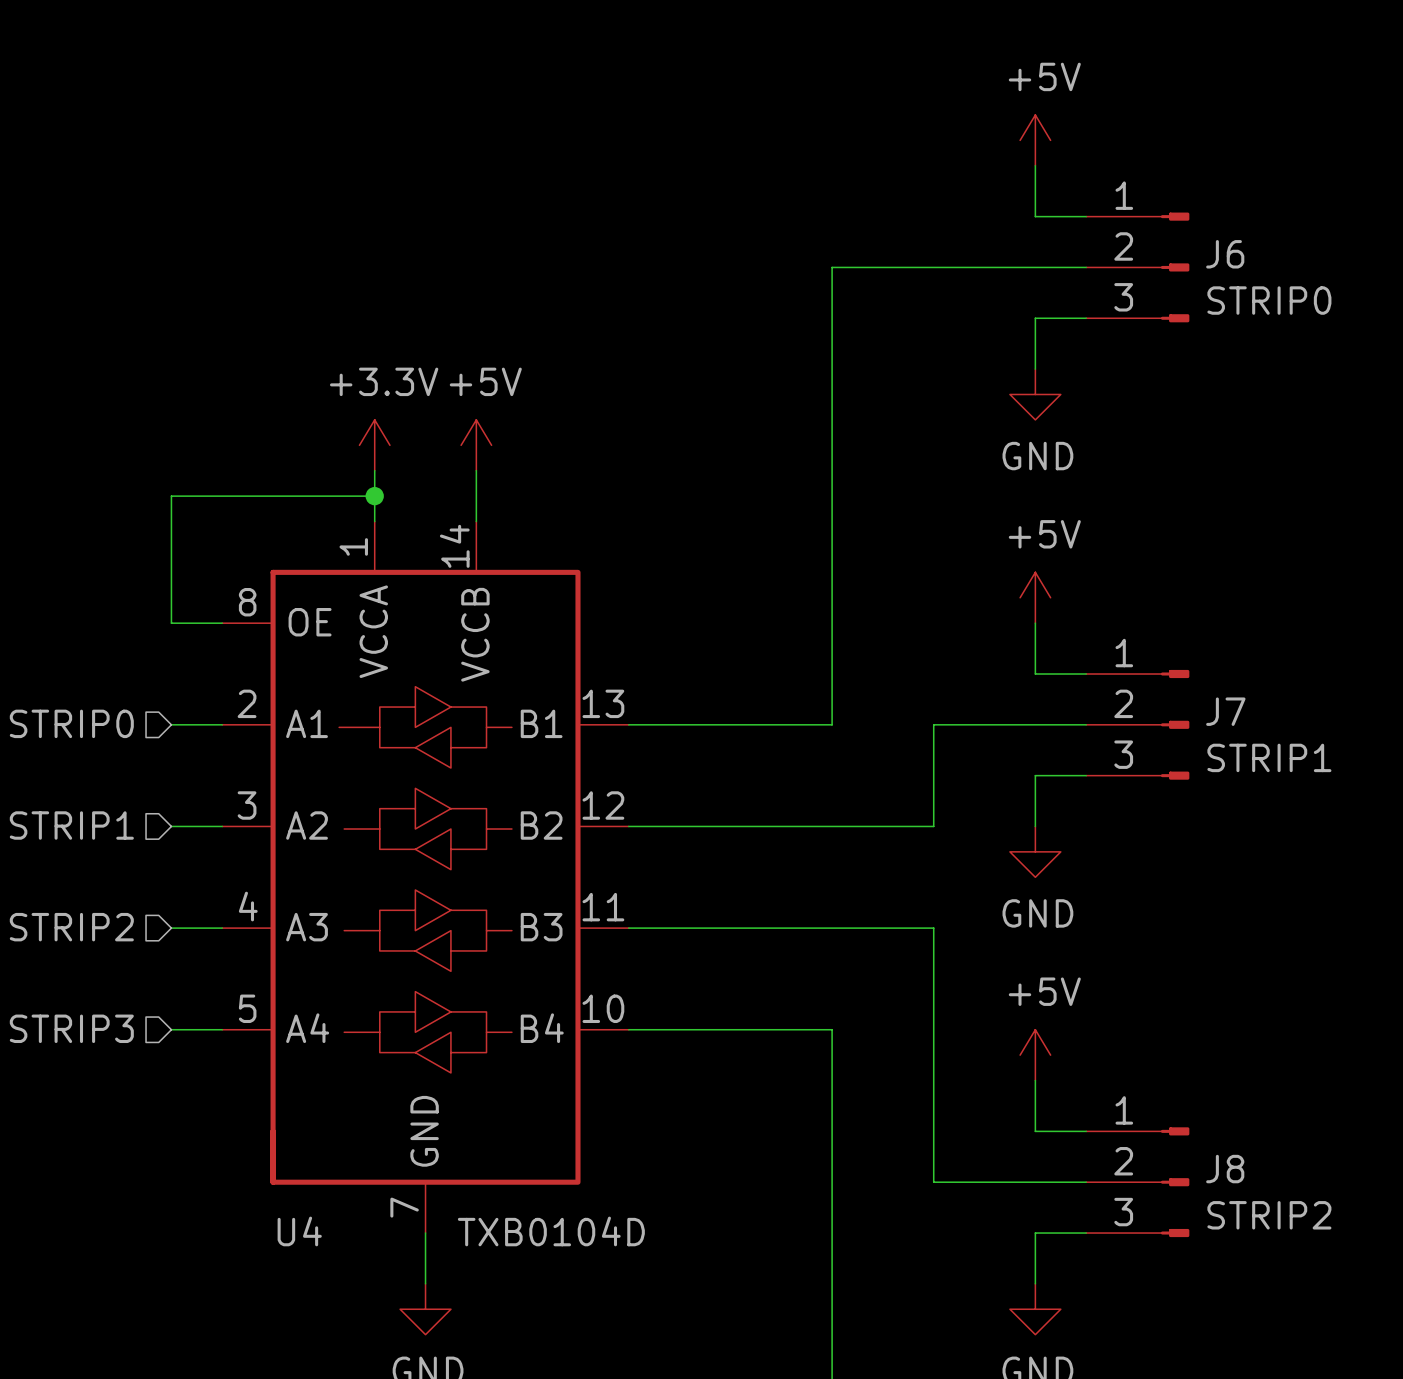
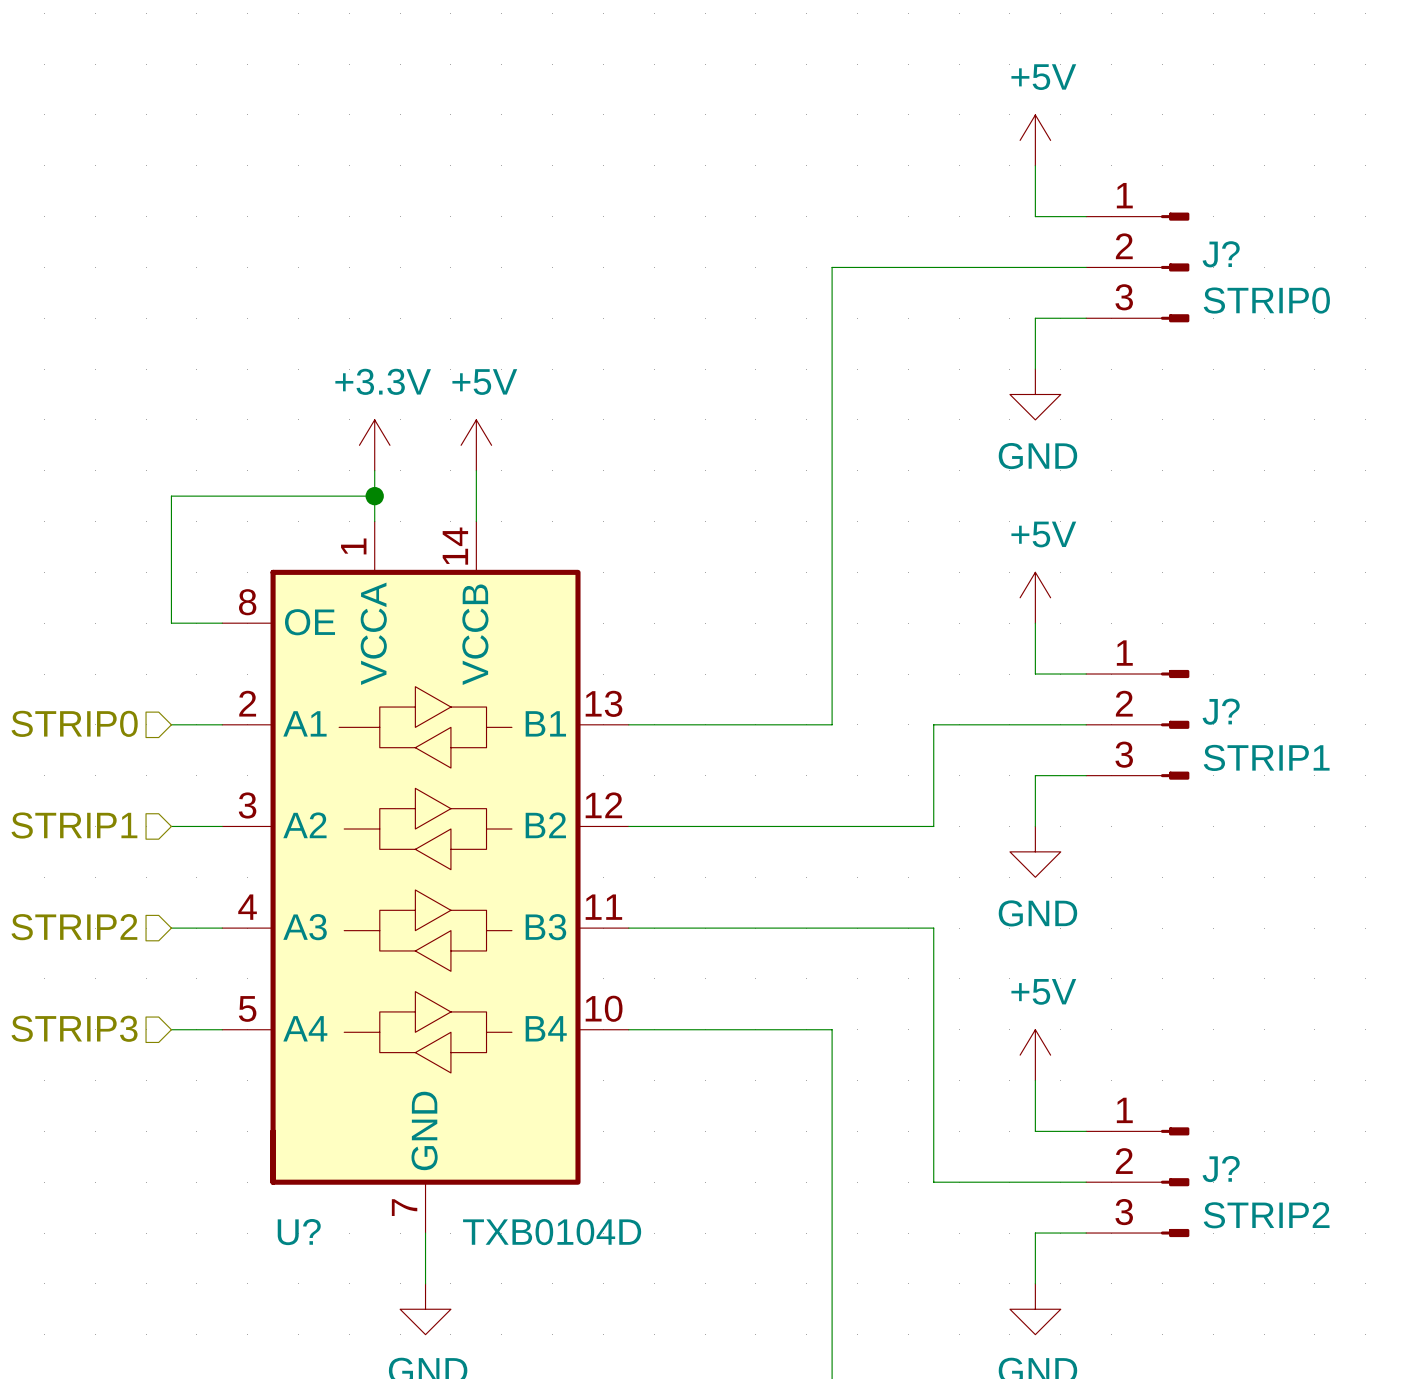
J6 name: J6 (1225, 254) -> J? (1221, 254)
J7 name: J7 (1225, 711) -> J? (1221, 711)
J8 name: J8 (1225, 1169) -> J? (1221, 1169)
U4 name: U4 (299, 1231) -> U? (299, 1232)

